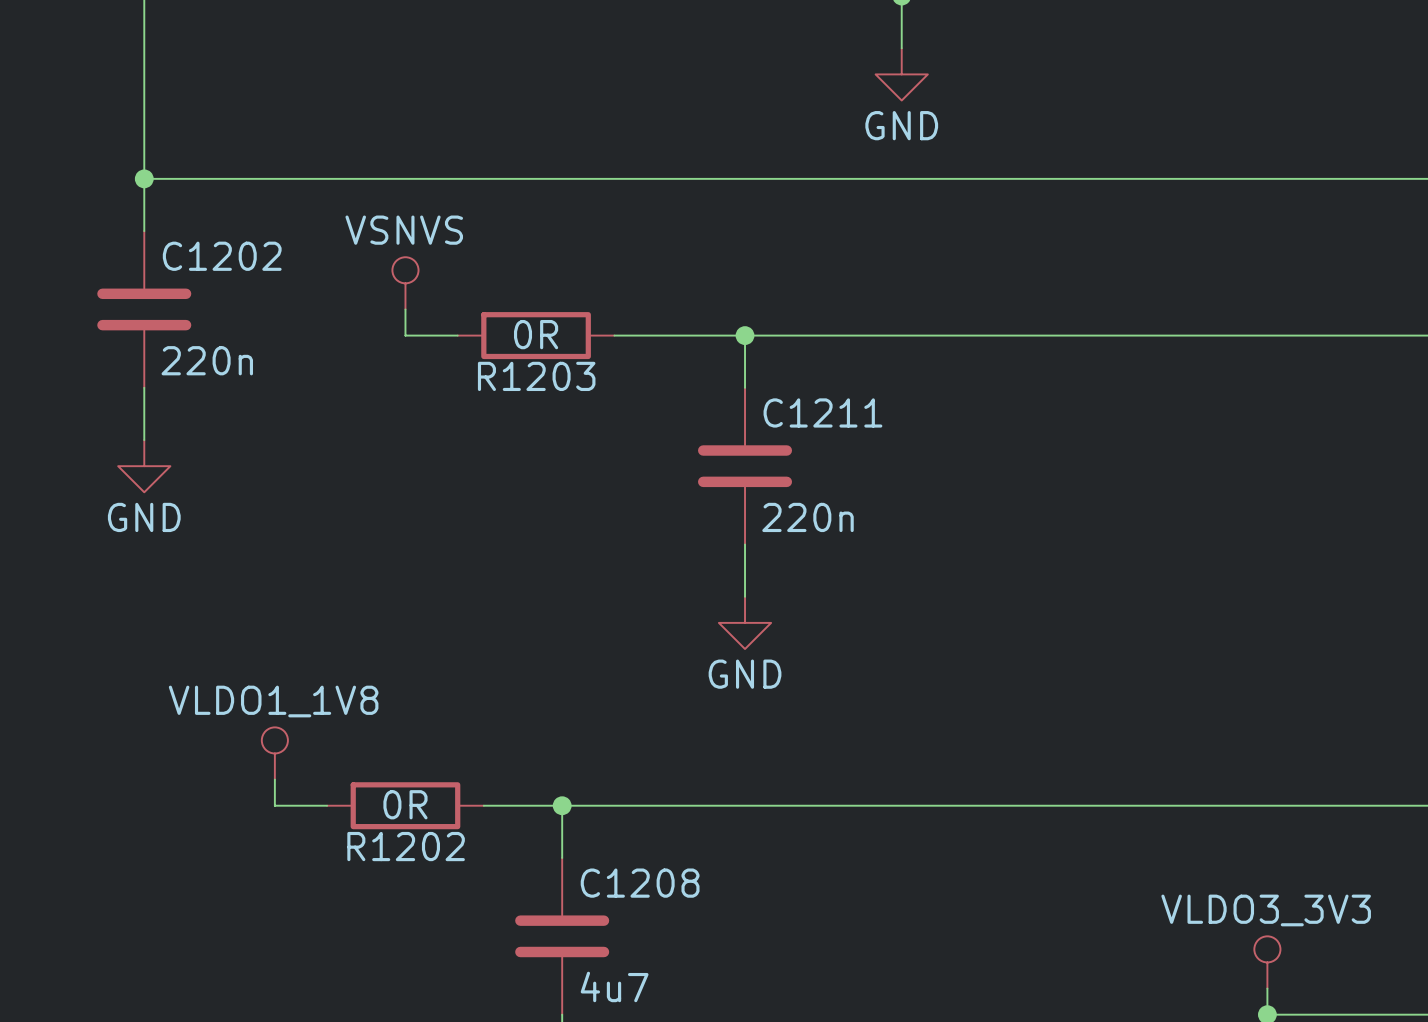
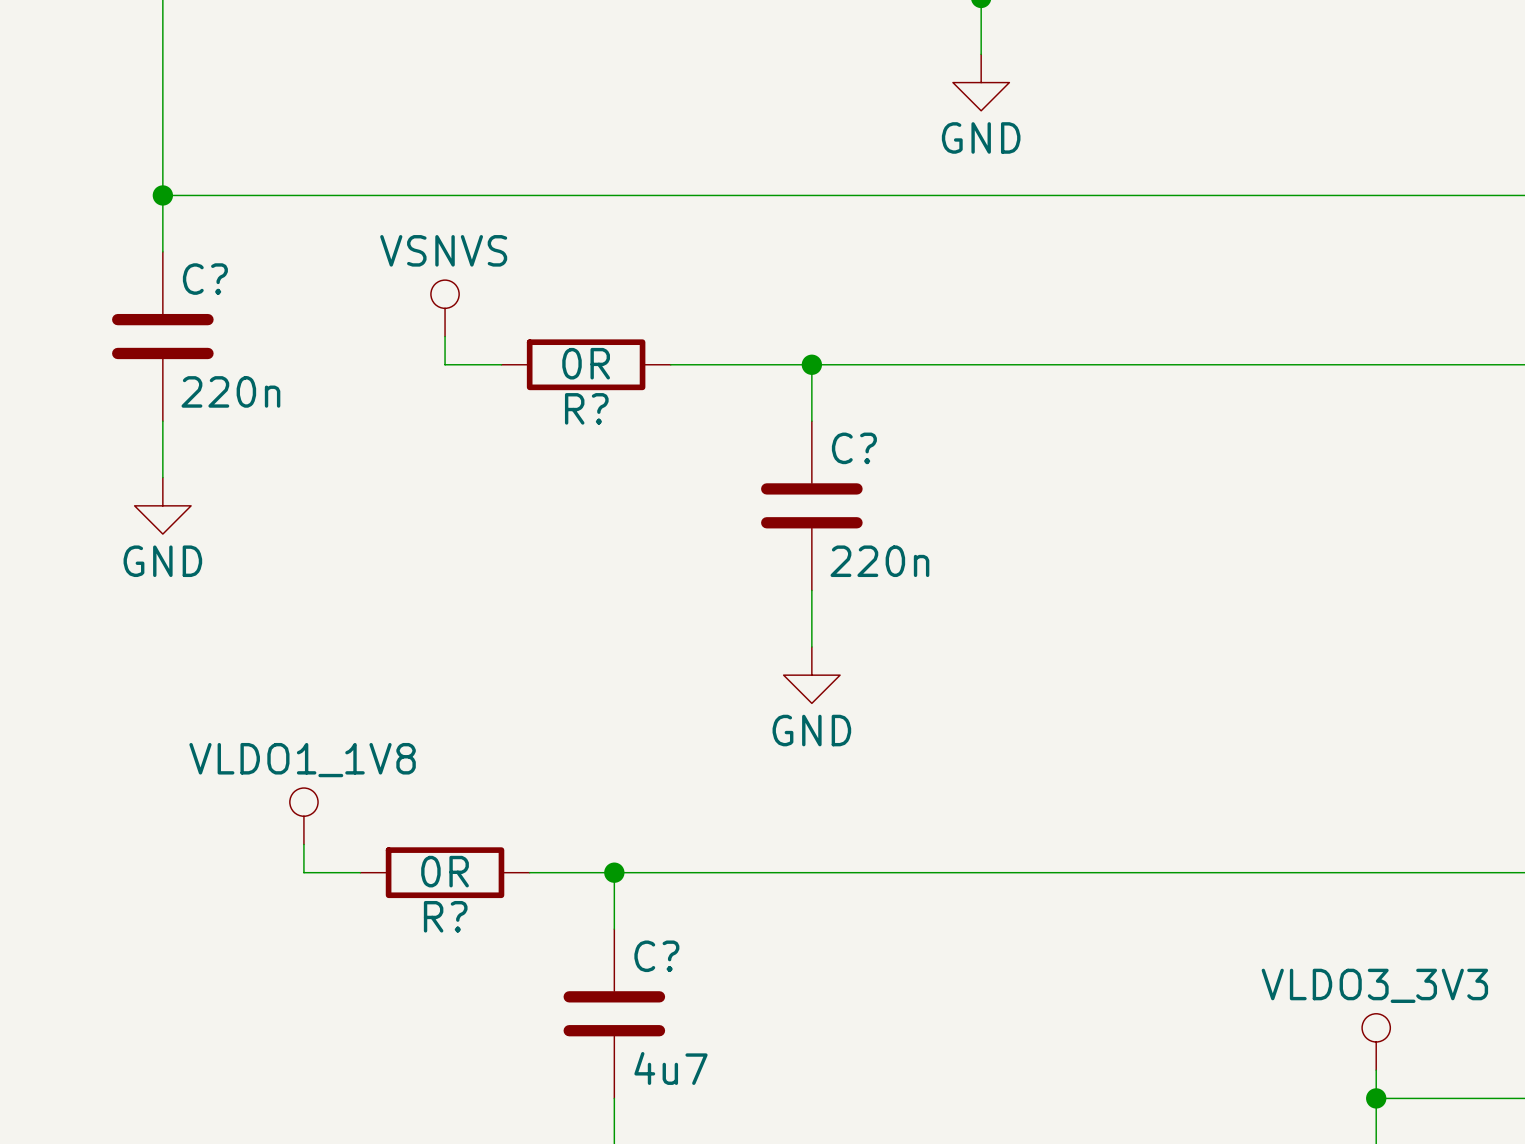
C1202 name: C1202 (222, 256) -> C? (205, 279)
R1203 name: R1203 (536, 376) -> R? (586, 408)
C1211 name: C1211 (822, 412) -> C? (854, 448)
R1202 name: R1202 (406, 846) -> R? (445, 916)
C1208 name: C1208 (640, 883) -> C? (656, 956)

